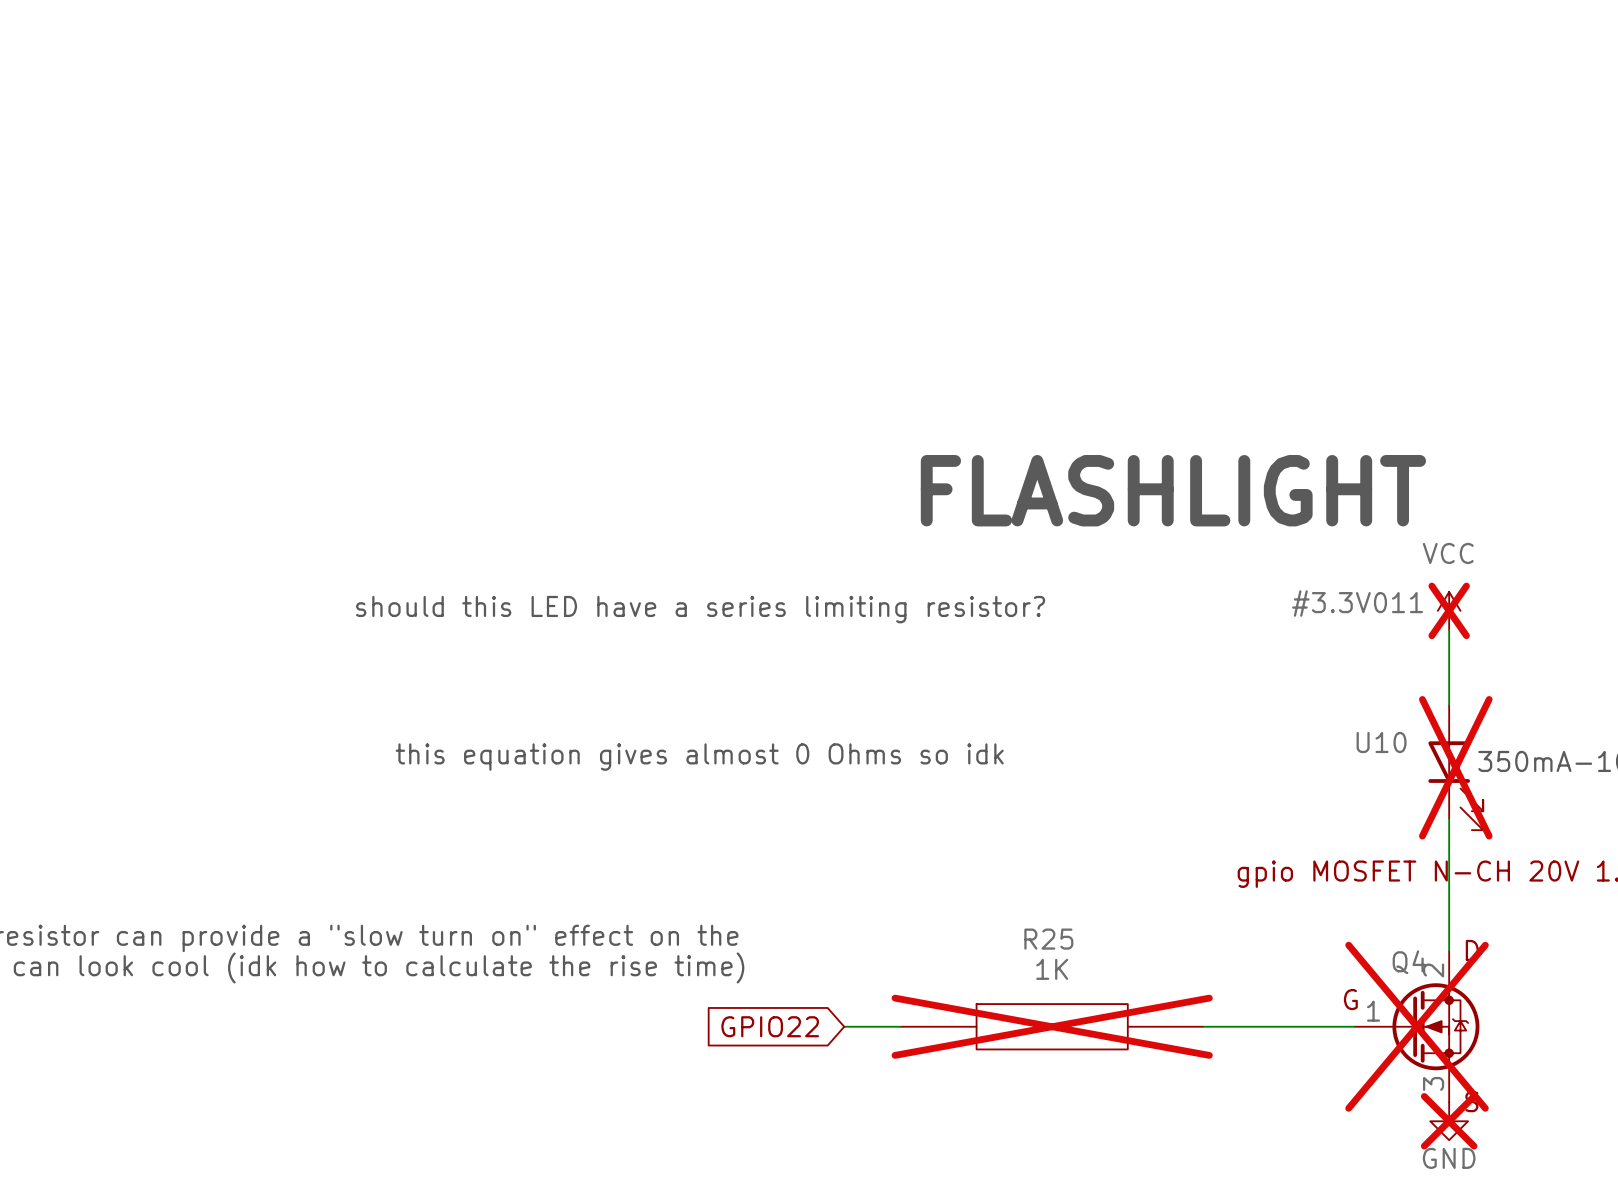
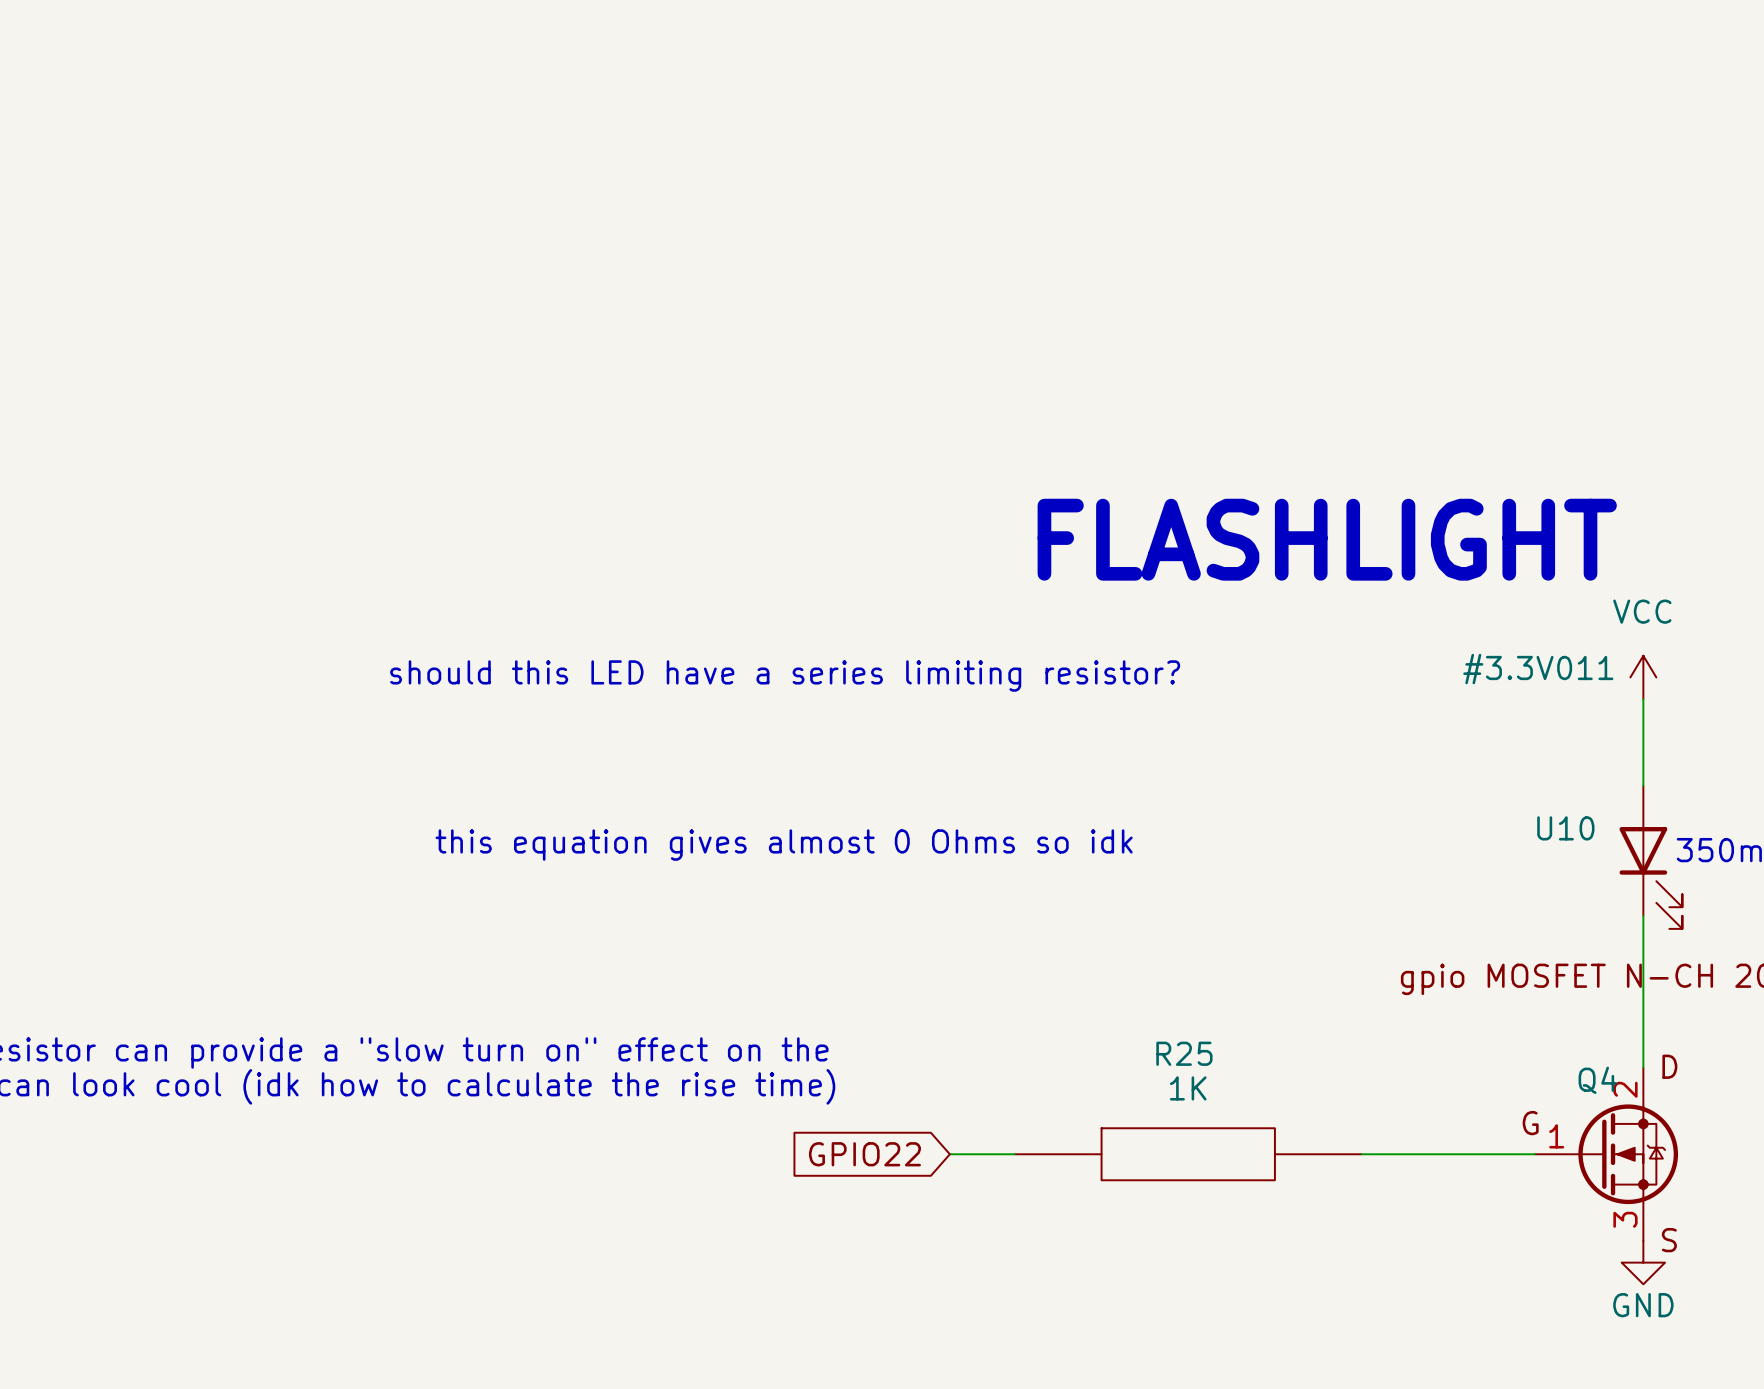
#3.3V011 do-not-place cross: (1449, 610) -> none
U10 do-not-place cross: (1455, 767) -> none
R25 do-not-place cross: (1052, 1026) -> none
Q4 do-not-place cross: (1417, 1026) -> none
power symbol do-not-place cross: (1449, 1121) -> none

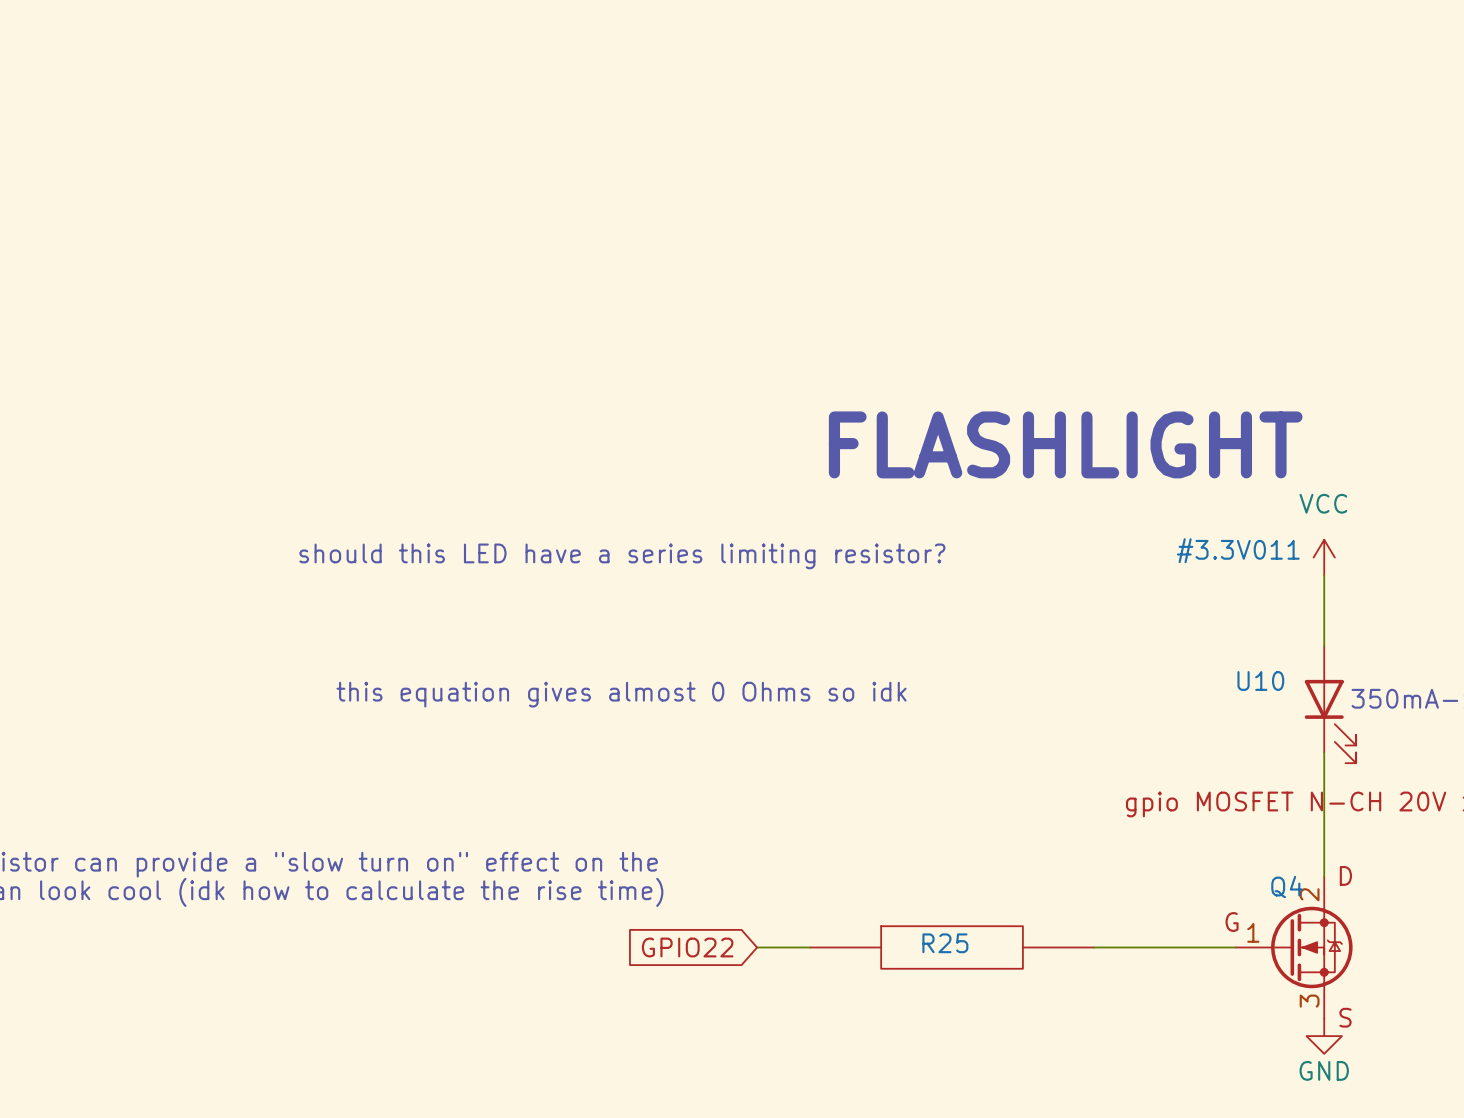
R25 name position: R25 (1184, 1053) -> R25 (945, 943)
R25 value: 1K (1188, 1088) -> none

